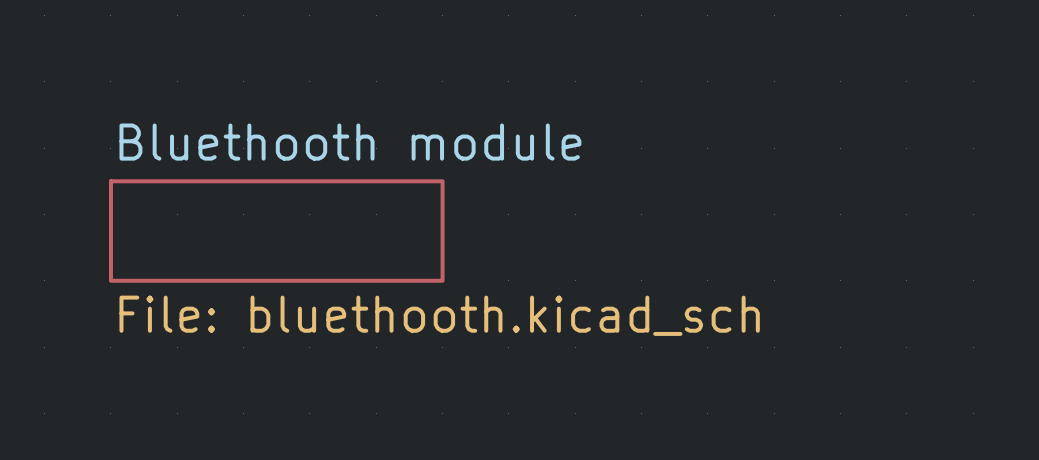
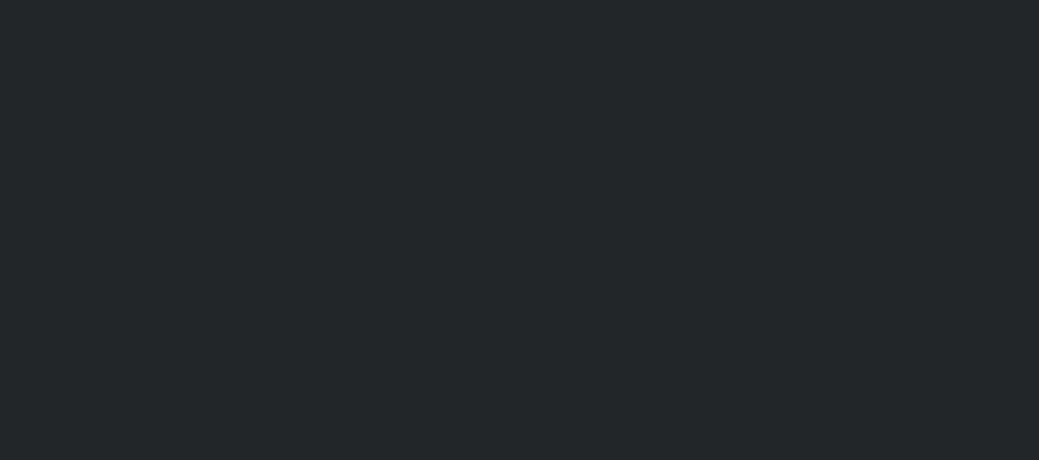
sheet Bluethooth module: File: bluethooth.kicad_sch (276, 231) -> none

